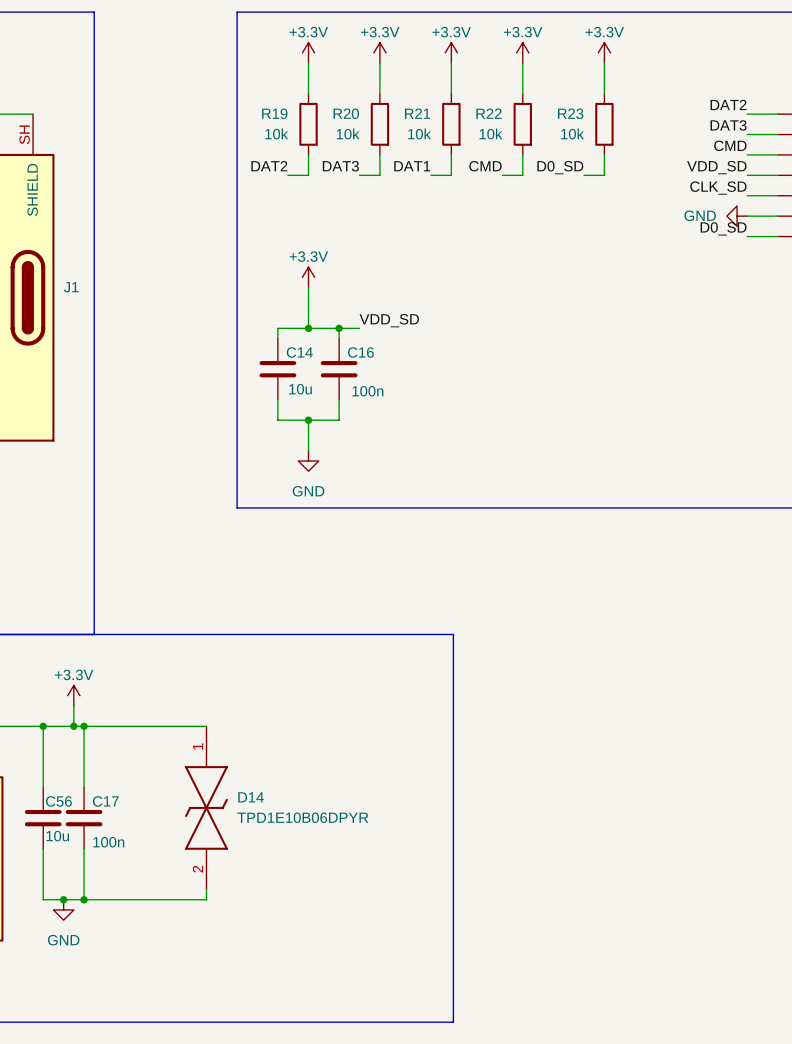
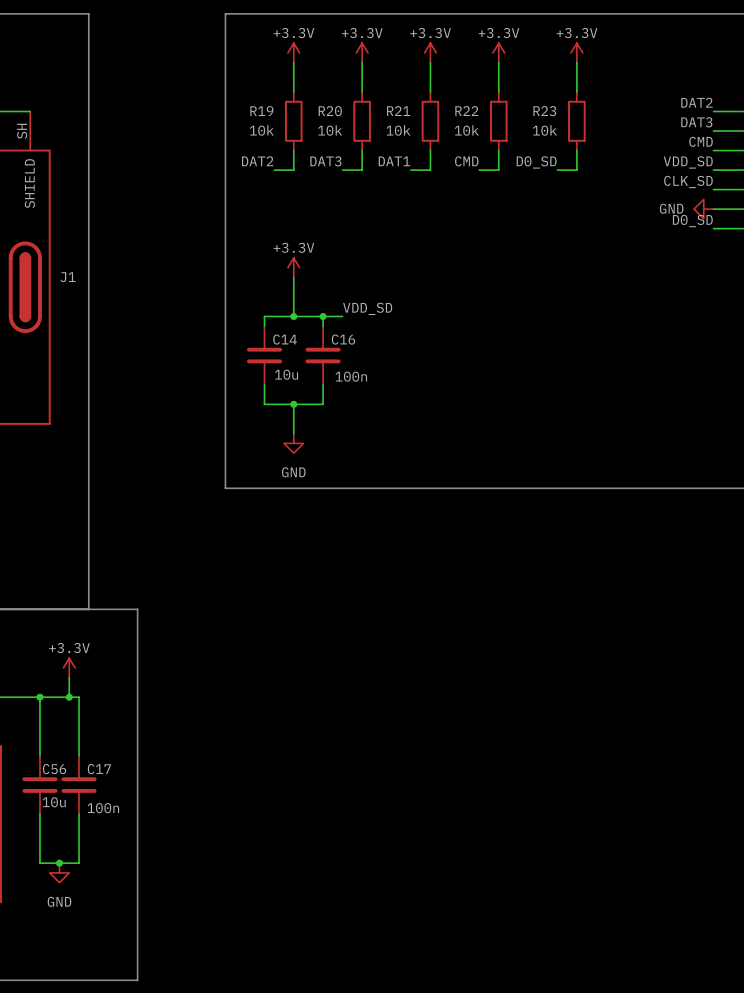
line: (145, 634) (453, 634) (453, 1022) (145, 1022) -> (137, 609) (137, 980)
wire: (84, 726) (206, 726) -> none
junction: (84, 726) -> none
D14: TPD1E10B06DPYR (206, 807) -> none
wire: (206, 889) (206, 899) (84, 899) -> none
junction: (84, 899) -> none

